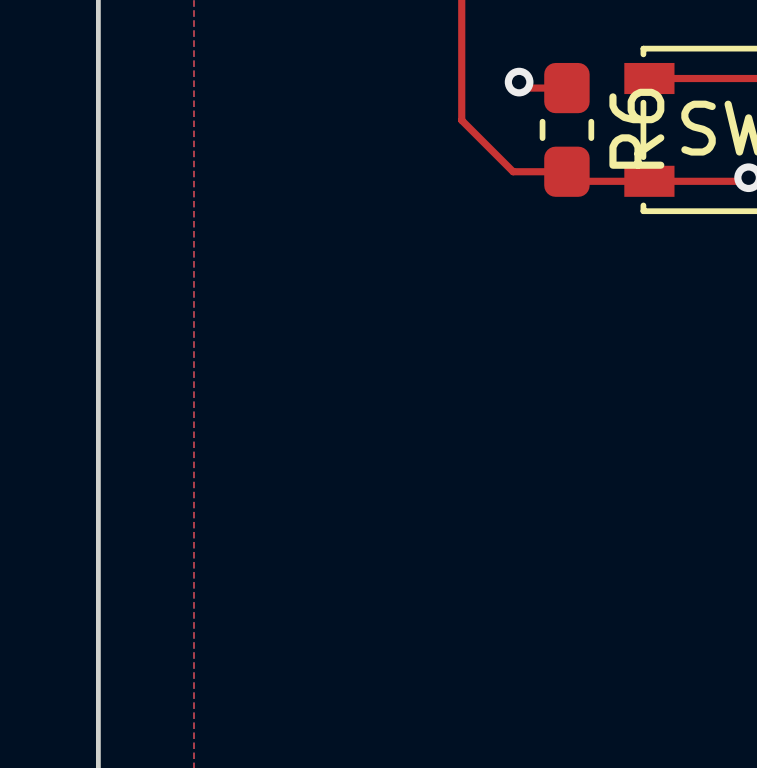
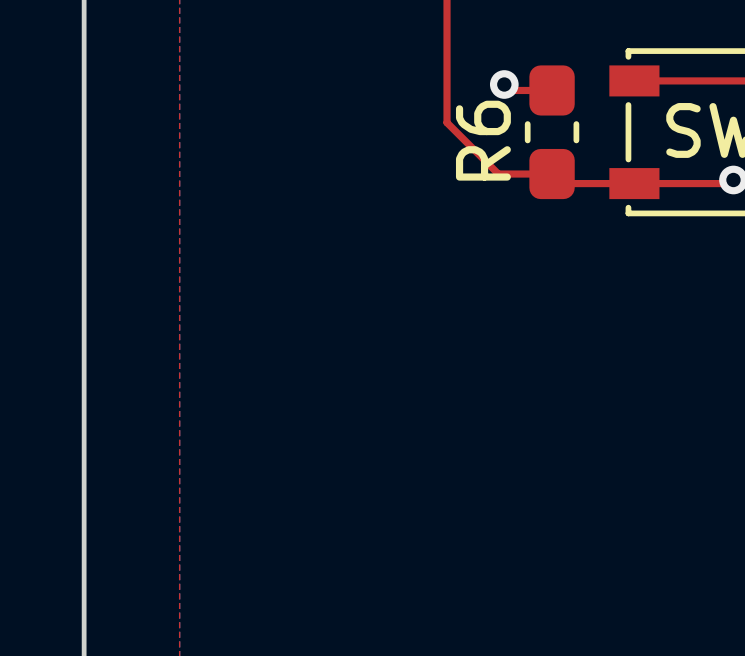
R6 name position: R6 (636, 128) -> R6 (483, 140)

